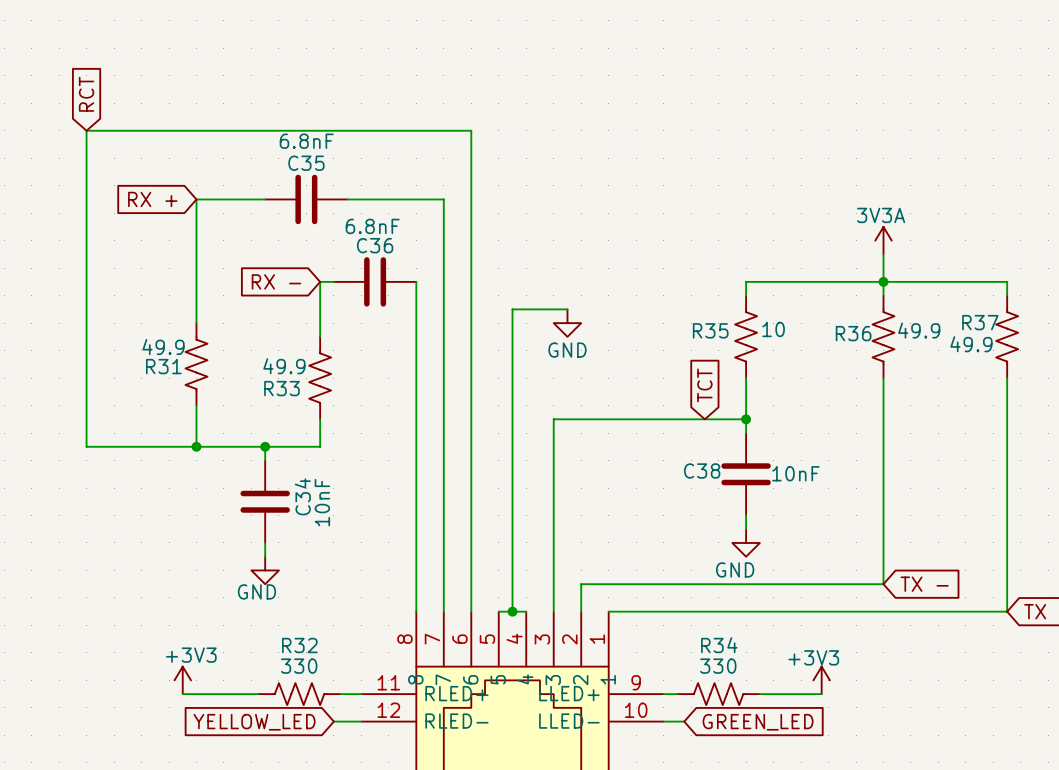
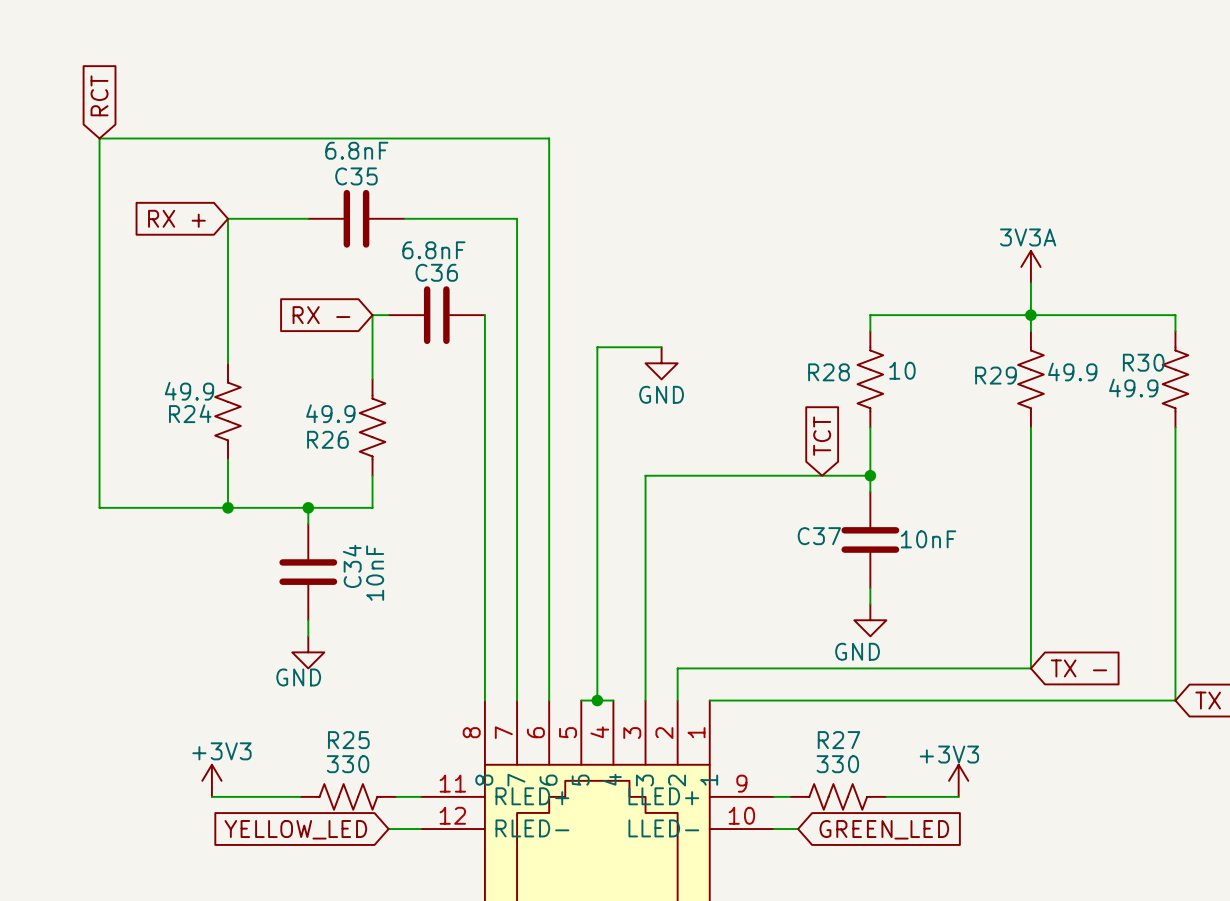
R37 name: R37 (980, 322) -> R30 (1143, 362)
R35 name: R35 (710, 330) -> R28 (828, 372)
R36 name: R36 (853, 333) -> R29 (995, 375)
R31 name: R31 (163, 366) -> R24 (190, 413)
R33 name: R33 (282, 388) -> R26 (327, 439)
C38 name: C38 (702, 471) -> C37 (819, 536)
R32 name: R32 (299, 645) -> R25 (348, 740)
R34 name: R34 (719, 645) -> R27 (838, 740)

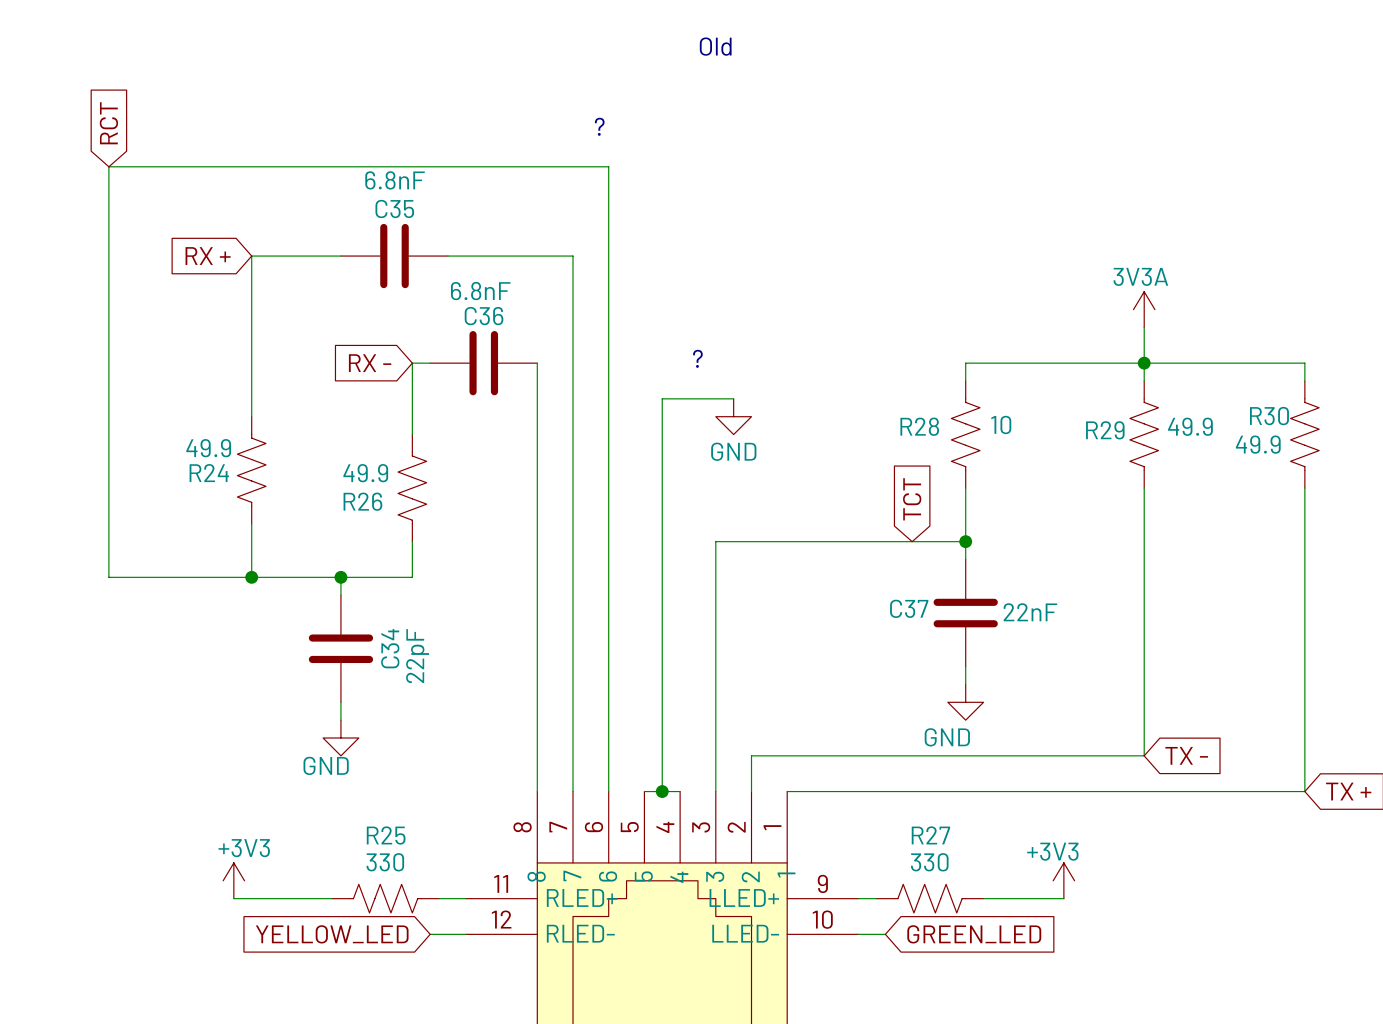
text: none -> Old (715, 46)
text: none -> ? (599, 126)
text: none -> ? (697, 358)
C37 value: 10nF (928, 539) -> 22nF (1030, 612)
C34 value: 10nF (375, 573) -> 22pF (417, 656)

